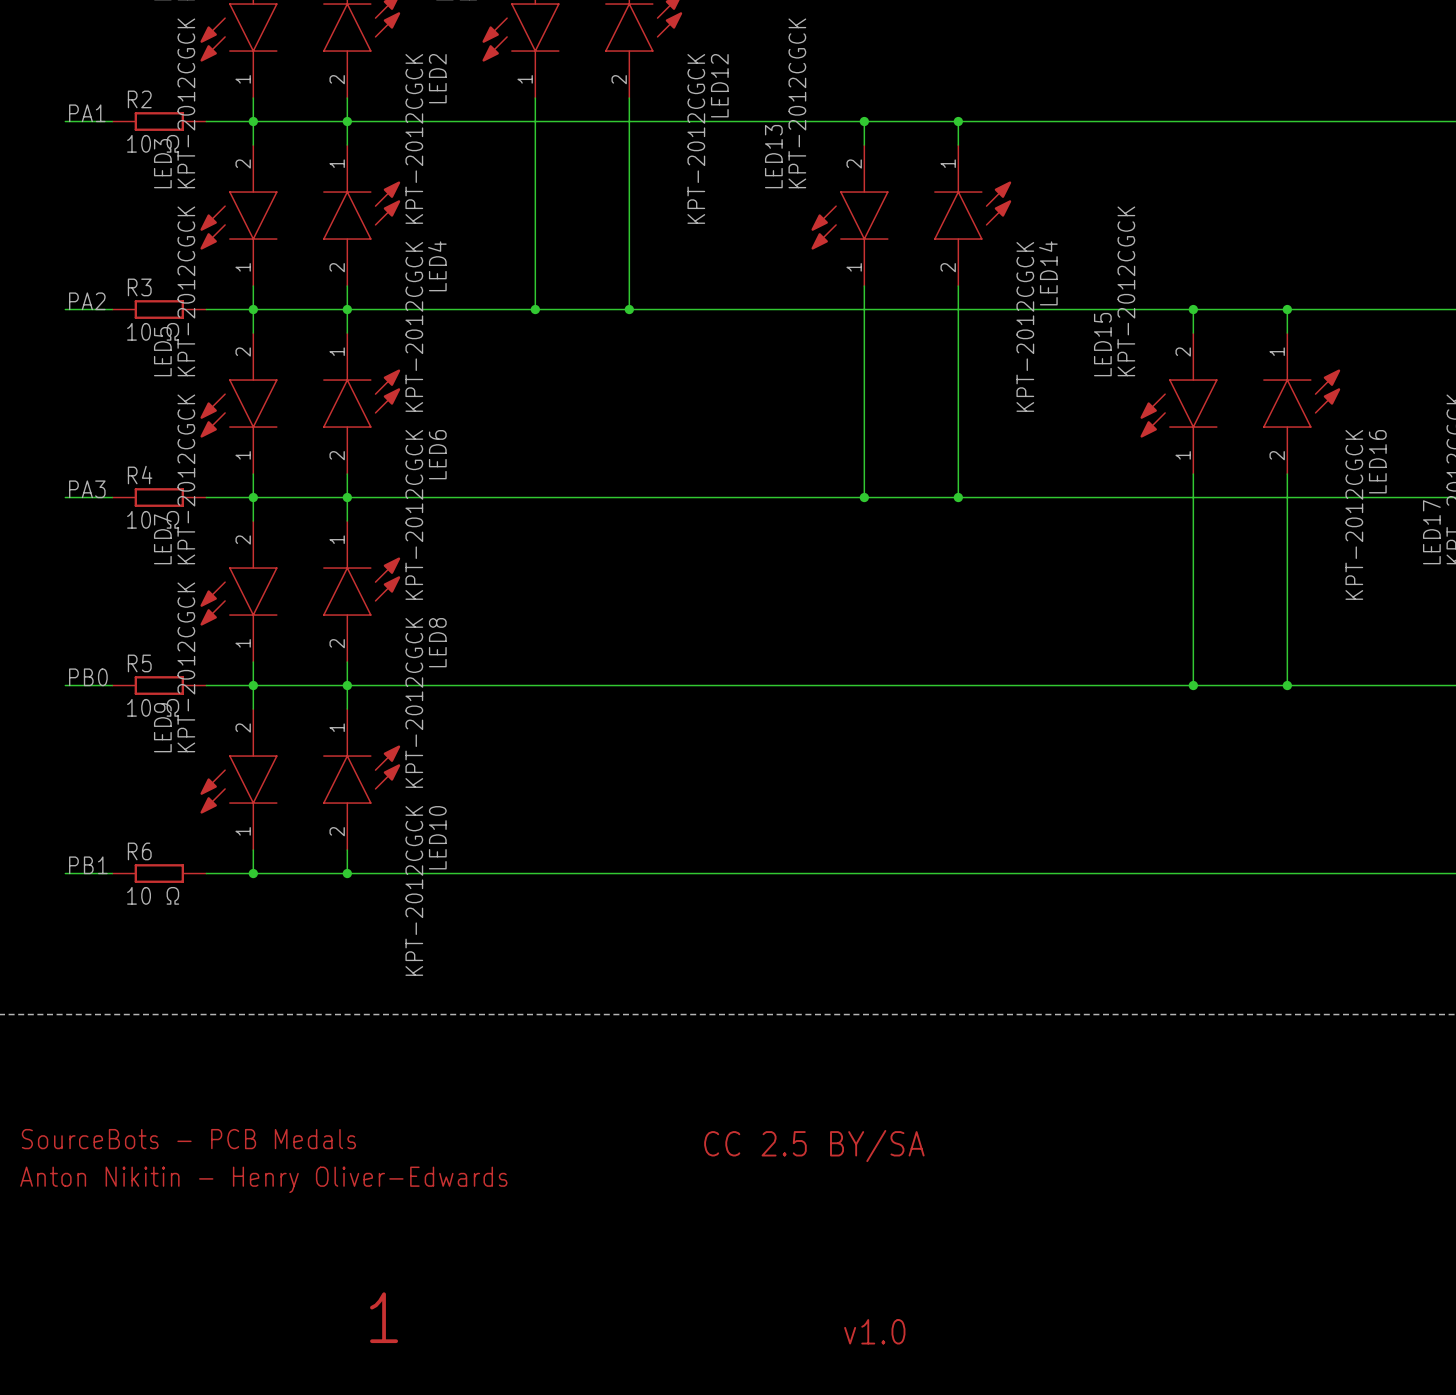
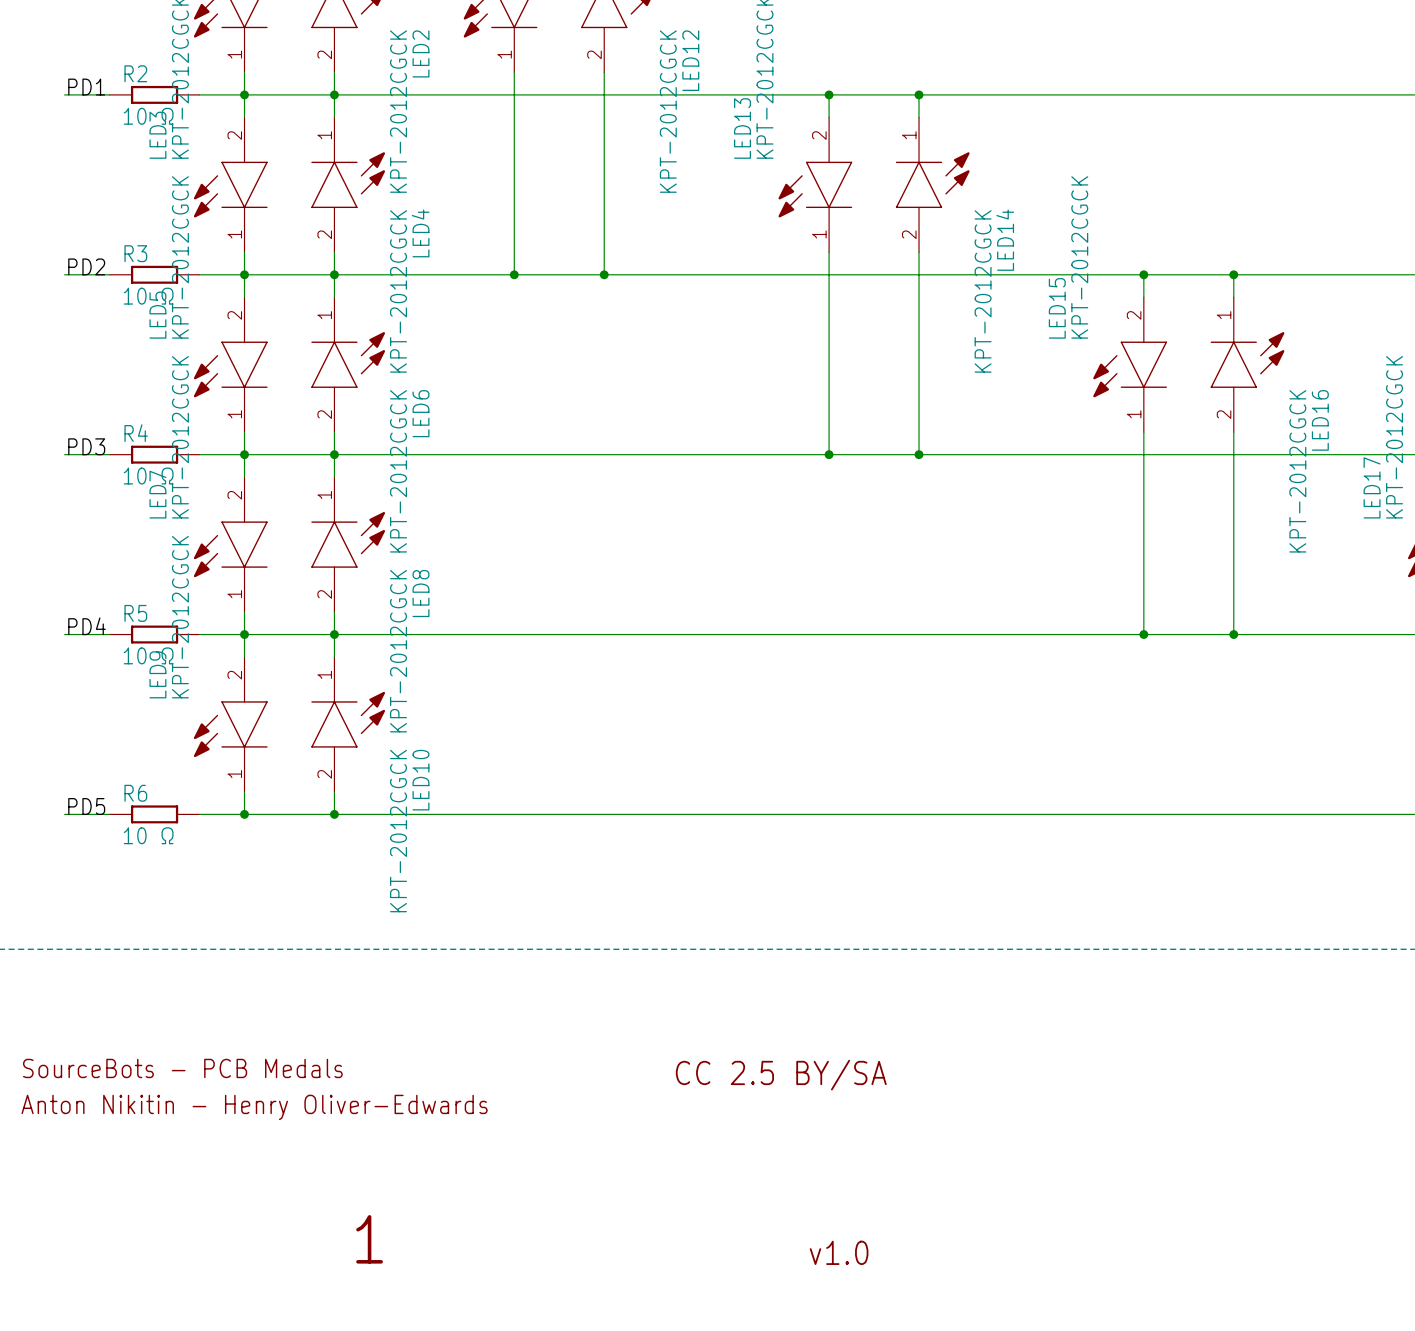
text: PA1 (87, 113) -> none
label: none -> PD1 (86, 87)
text: PA2 (87, 301) -> none
label: none -> PD2 (86, 266)
text: PA3 (87, 489) -> none
label: none -> PD3 (86, 446)
label: none -> PD4 (87, 626)
text: PB0 (88, 677) -> none
text: PB1 (88, 865) -> none
label: none -> PD5 (86, 806)

